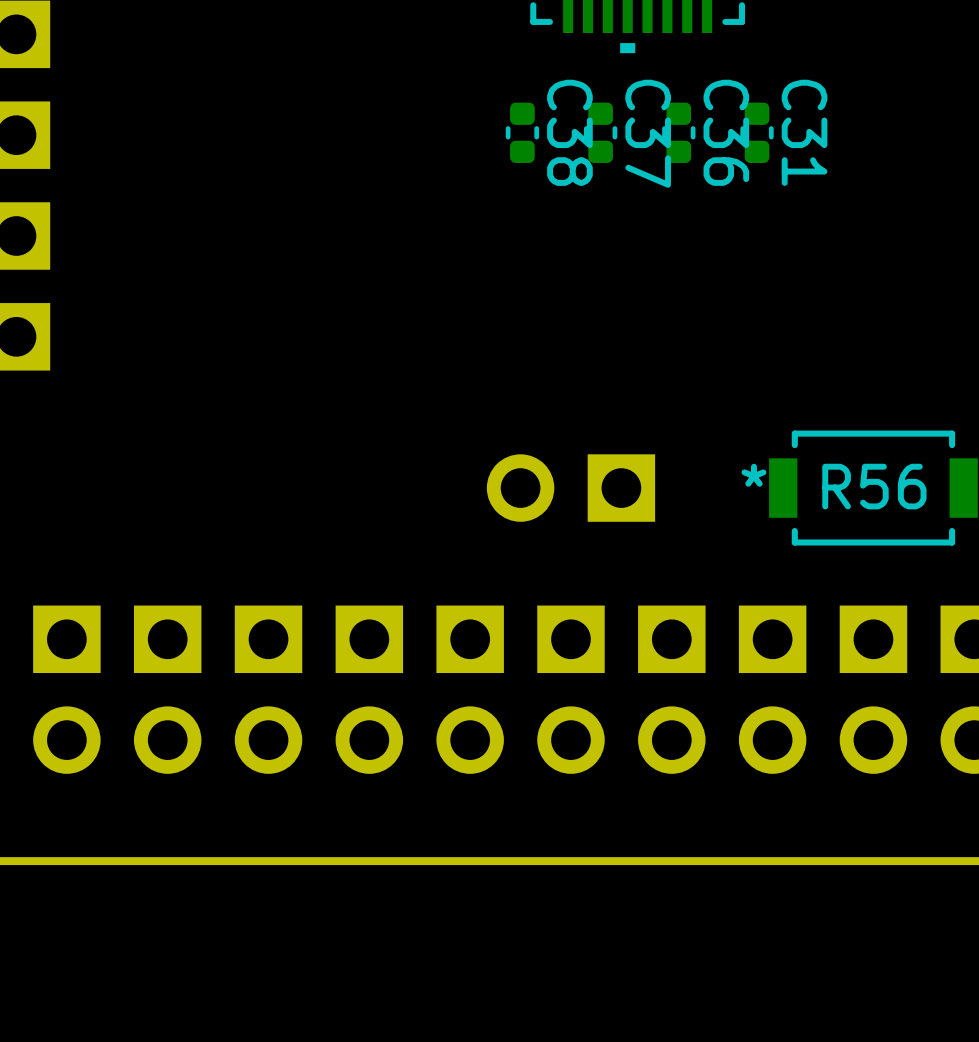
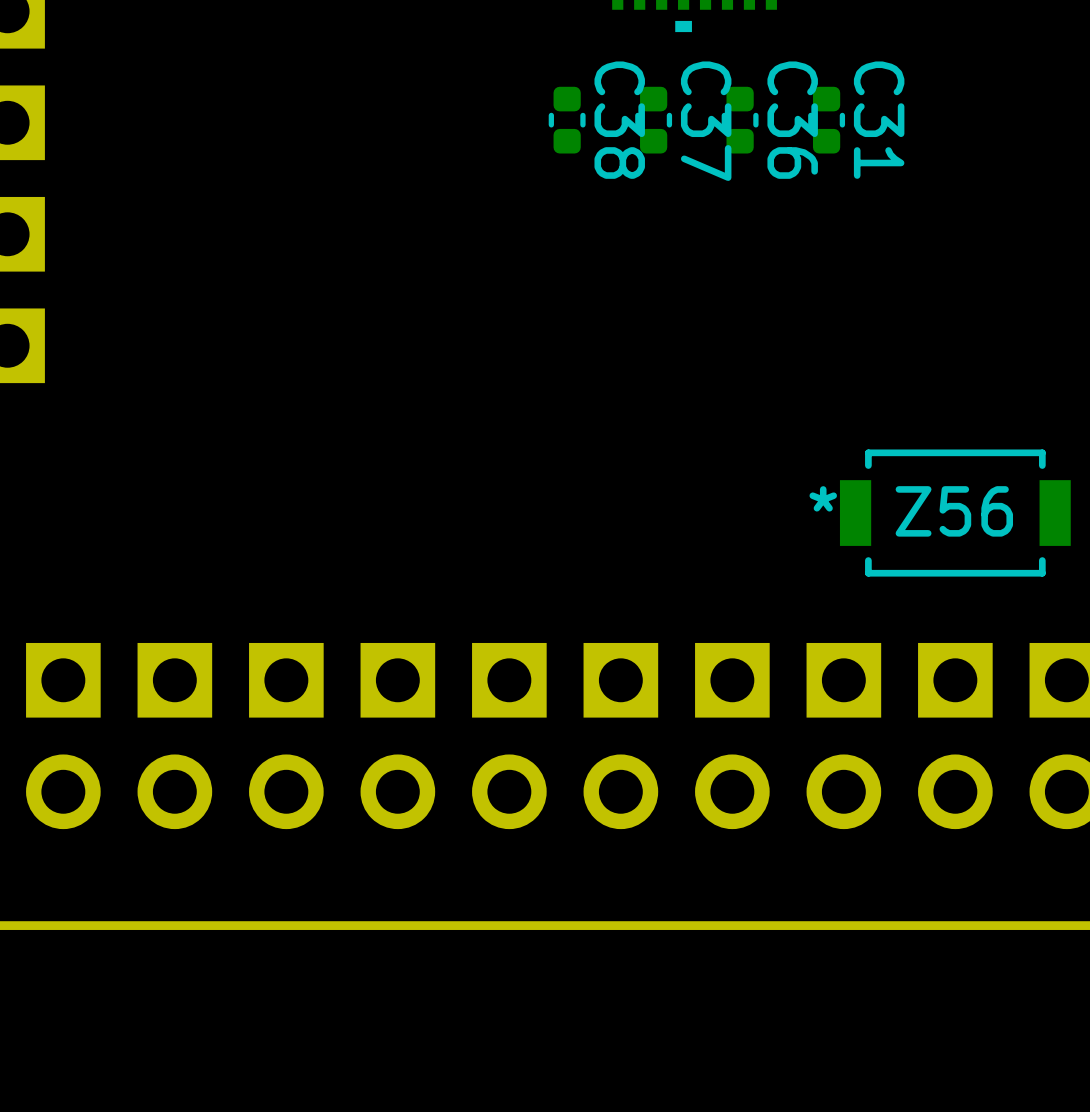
R56 name: R56 (874, 486) -> Z56 (954, 511)
part: (570, 488) -> none

